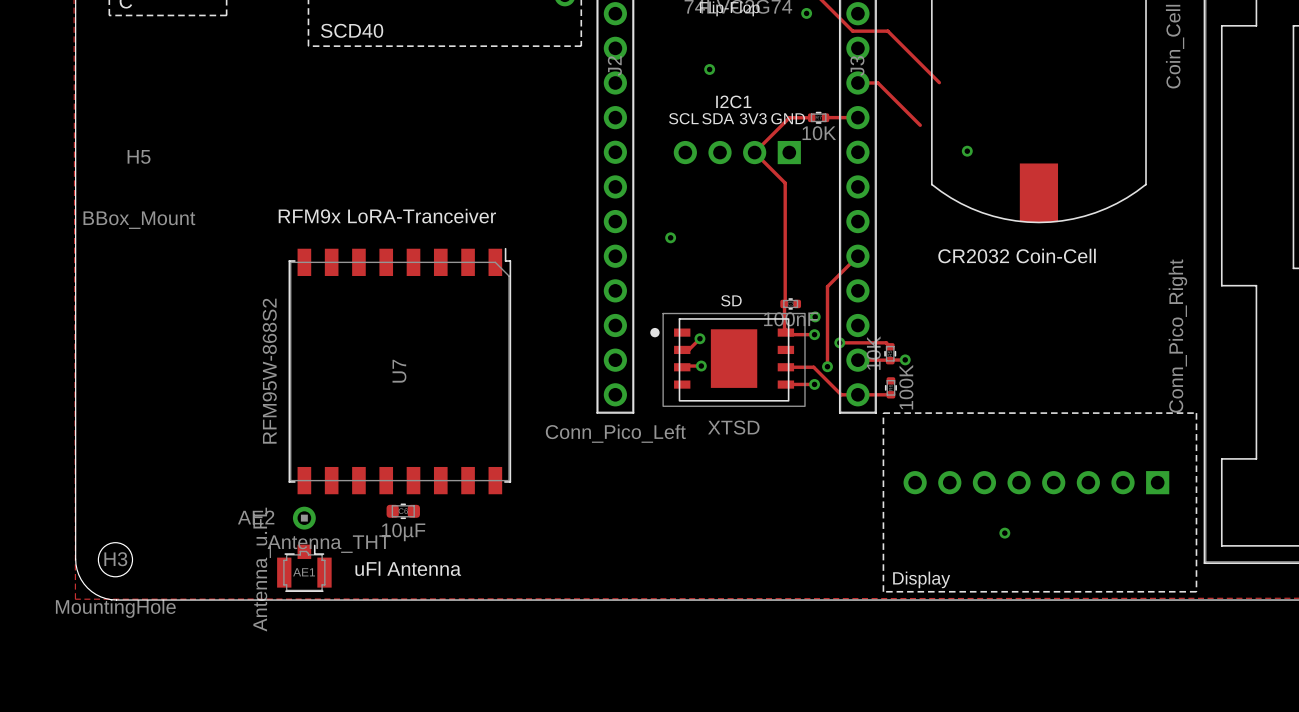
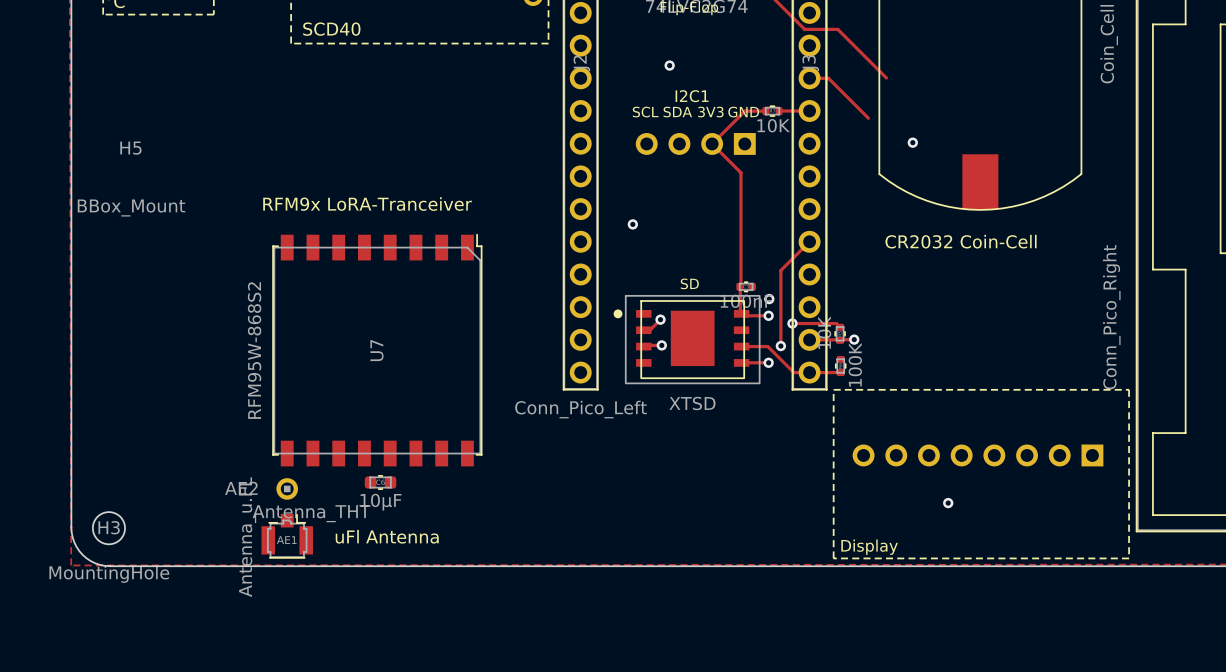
via: (806, 13) -> none

